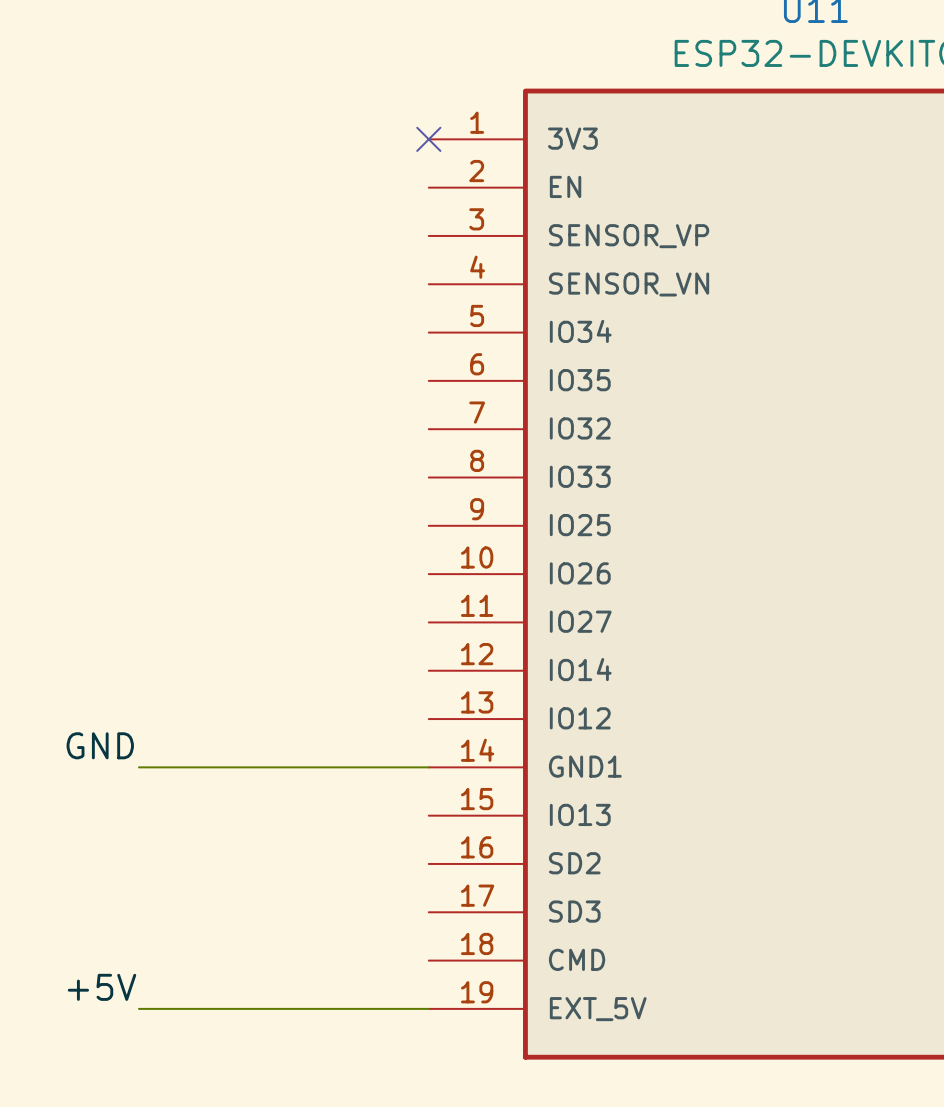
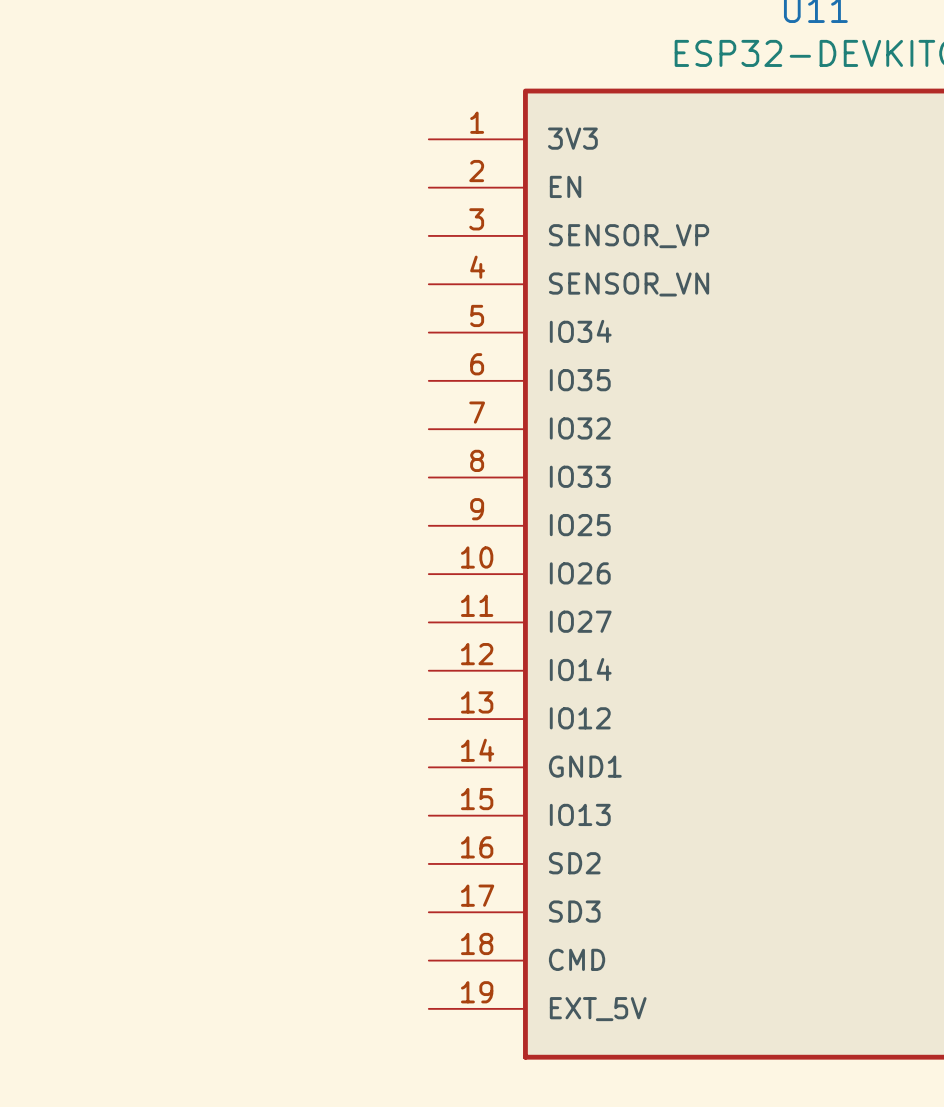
no-connect mark: (428, 139) -> none
label: GND (100, 745) -> none
wire: (138, 767) (428, 767) -> none
label: +5V (101, 987) -> none
wire: (138, 1008) (428, 1008) -> none

